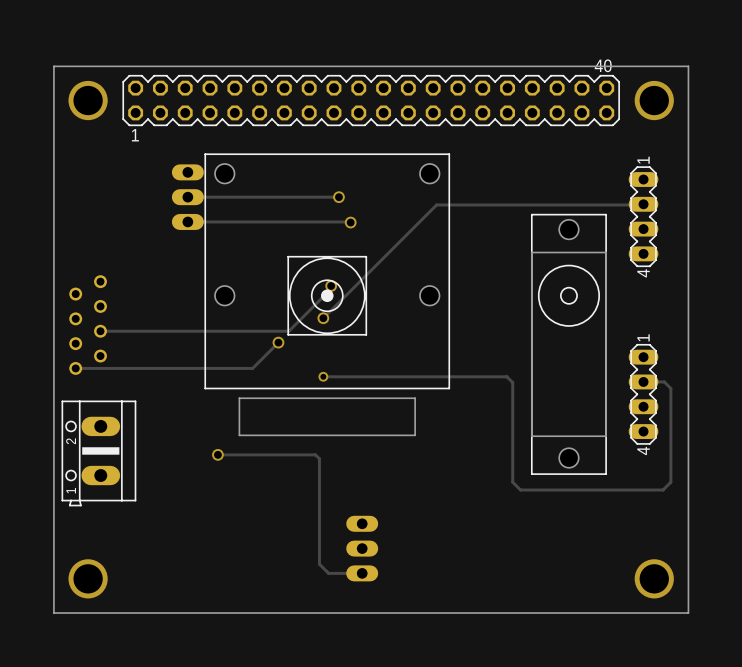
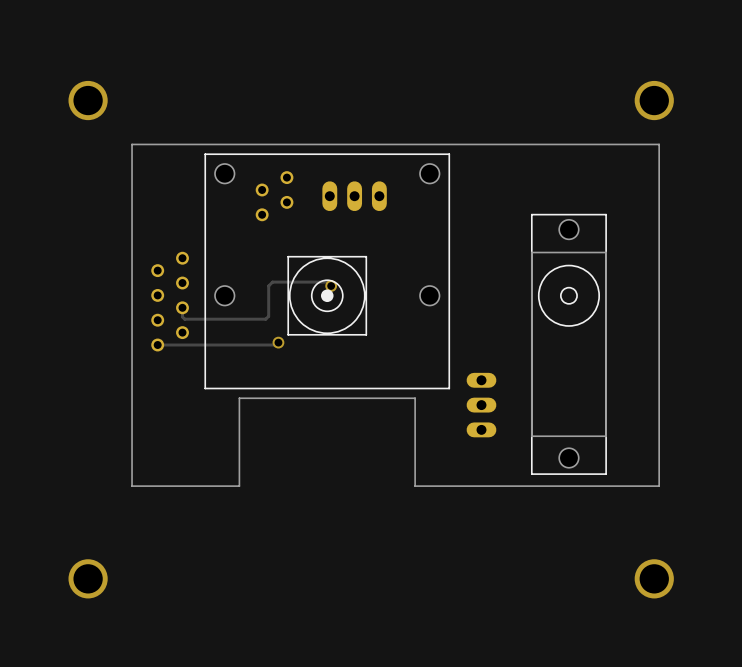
board edge: (53, 66) (688, 66) (688, 613) (53, 613) (53, 66) -> none
part: (371, 100) -> none
part: none -> (274, 196)
part: none -> (354, 196)
track: (187, 197) (338, 197) -> none
part: (187, 197) -> none
via: (338, 197) -> none
track: (643, 204) (436, 204) (323, 318) -> none
part: (643, 216) -> none
track: (187, 221) (350, 222) -> none
via: (350, 222) -> none
track: none -> (329, 282) (272, 282) (268, 286) (268, 316) (265, 319) (184, 319) (182, 316) (182, 307)
track: (331, 286) (331, 288) (288, 331) (100, 331) -> none
via: (323, 318) -> none
part position: (88, 325) -> (170, 301)
track: (276, 345) (252, 368) (75, 368) -> (276, 345) (157, 345)
track: (323, 376) (506, 376) (512, 382) (512, 482) (520, 490) (663, 490) (670, 482) (670, 388) (664, 381) (643, 381) -> none
via: (323, 376) -> none
part: (643, 394) -> none
part: none -> (481, 405)
board edge: (239, 435) (415, 435) -> (239, 435) (239, 486) (132, 486) (132, 144) (659, 144) (659, 486) (415, 486) (415, 435)
part: (98, 453) -> none
track: (217, 454) (315, 454) (319, 458) (319, 564) (328, 573) (362, 573) -> none
via: (217, 454) -> none
part: (362, 548) -> none

